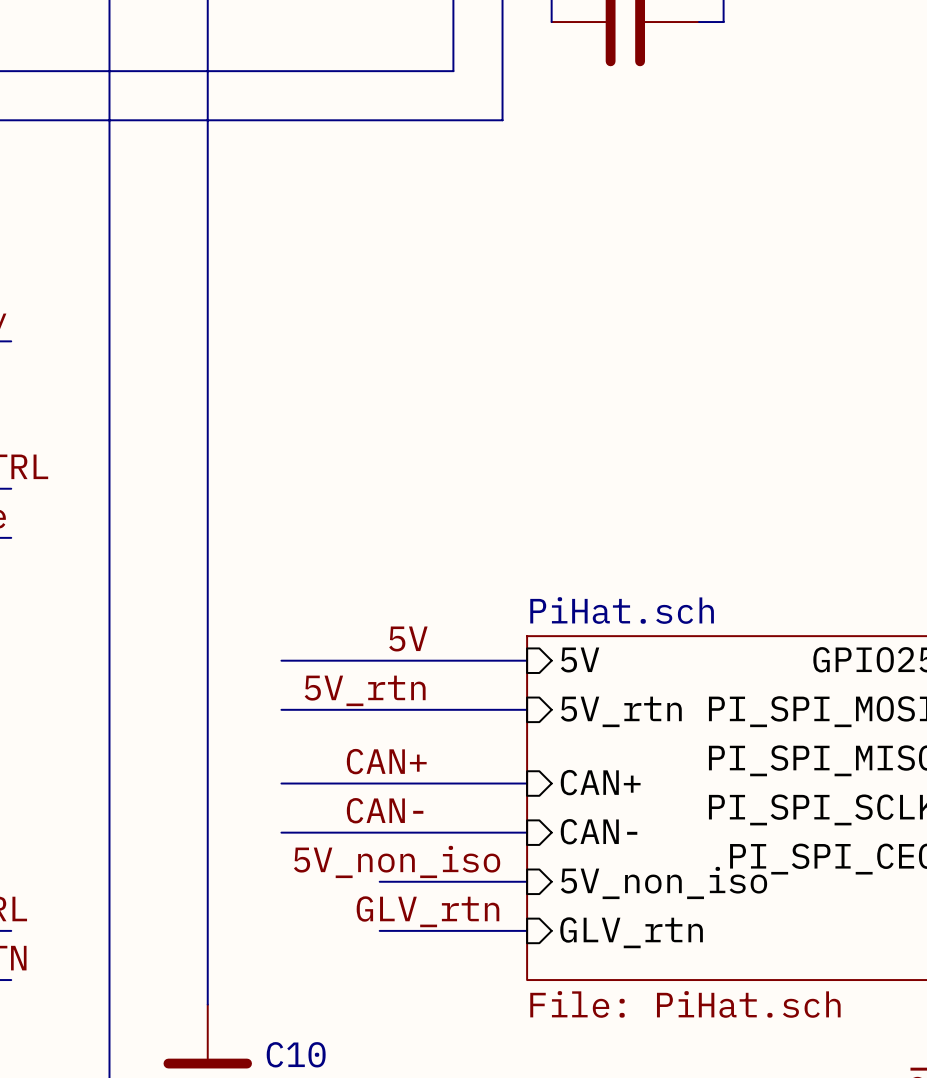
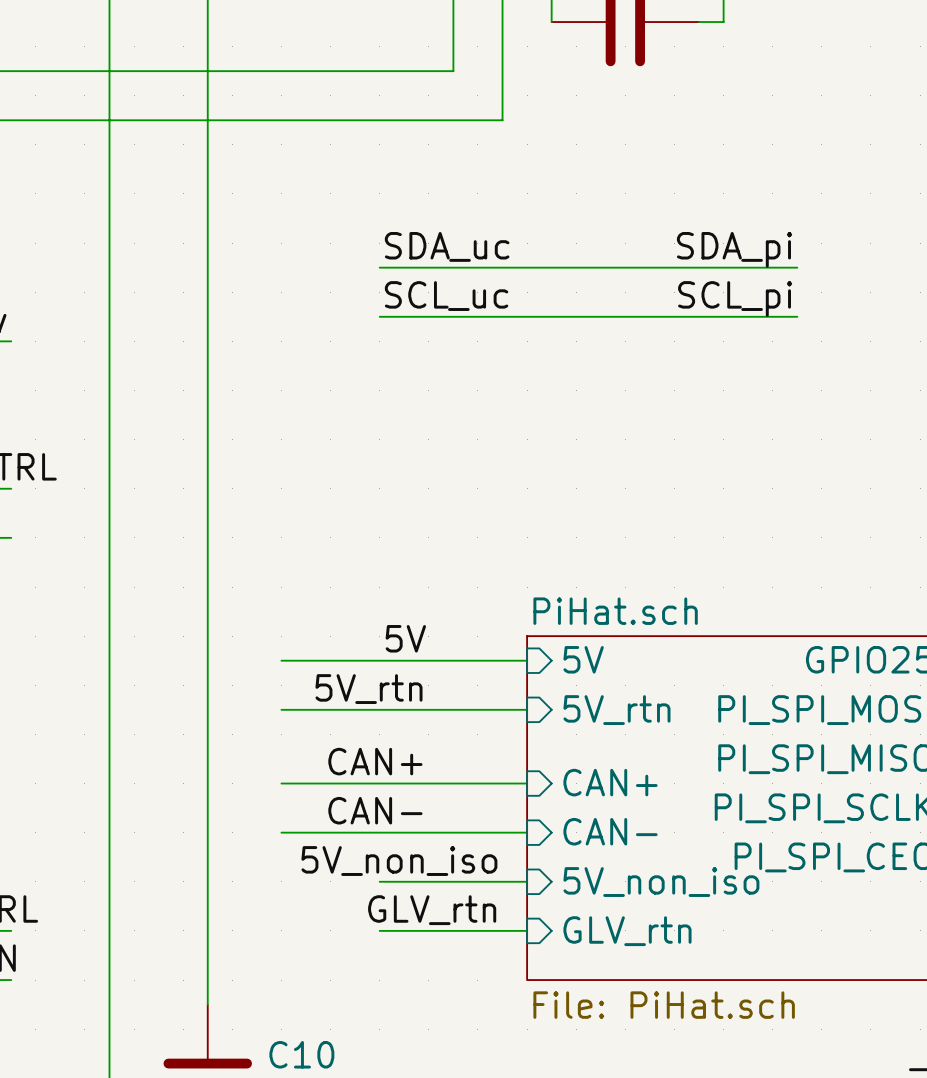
label: none -> SDA_uc (447, 246)
label: none -> SDA_pi (734, 249)
wire: none -> (379, 267) (797, 267)
label: none -> SCL_uc (446, 296)
label: none -> SCL_pi (735, 298)
wire: none -> (379, 316) (797, 316)

